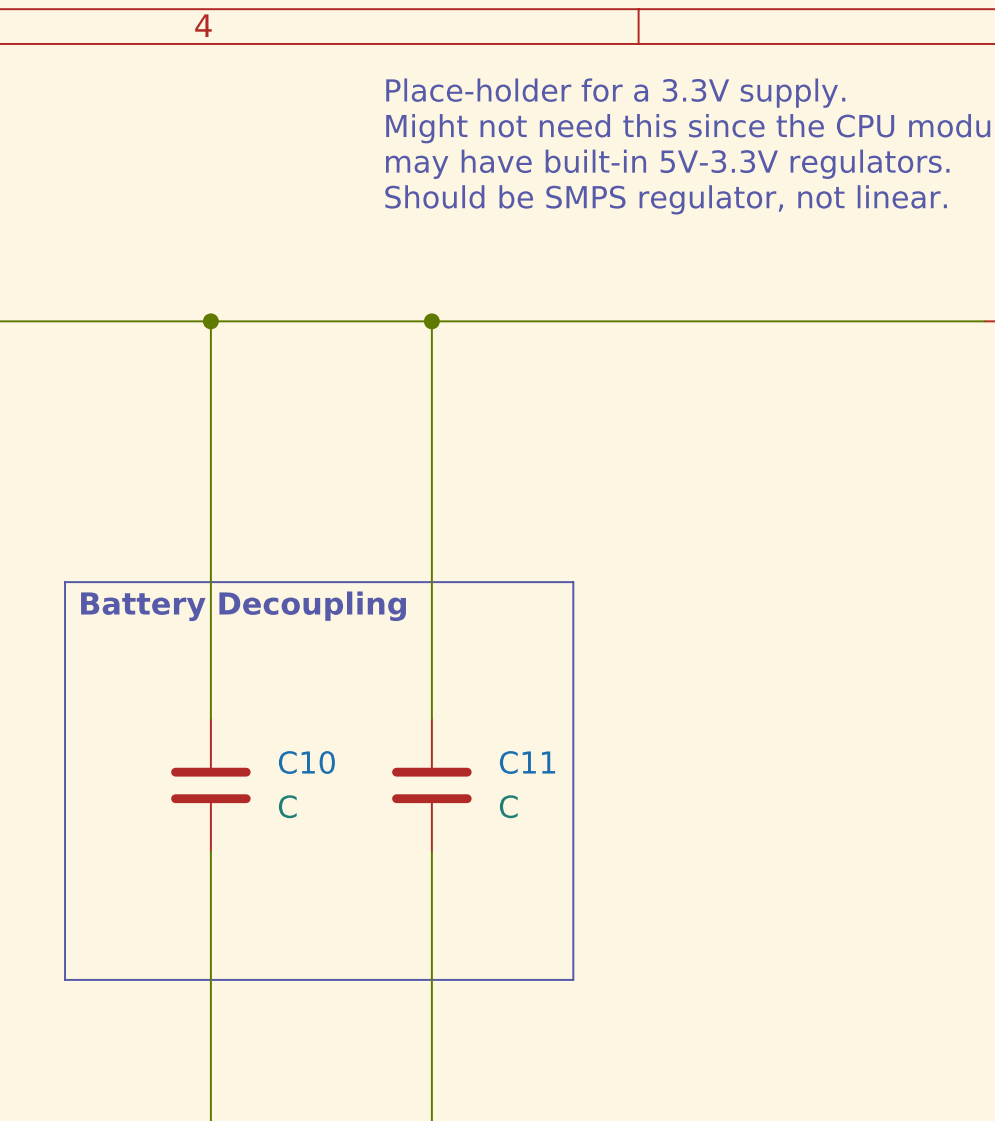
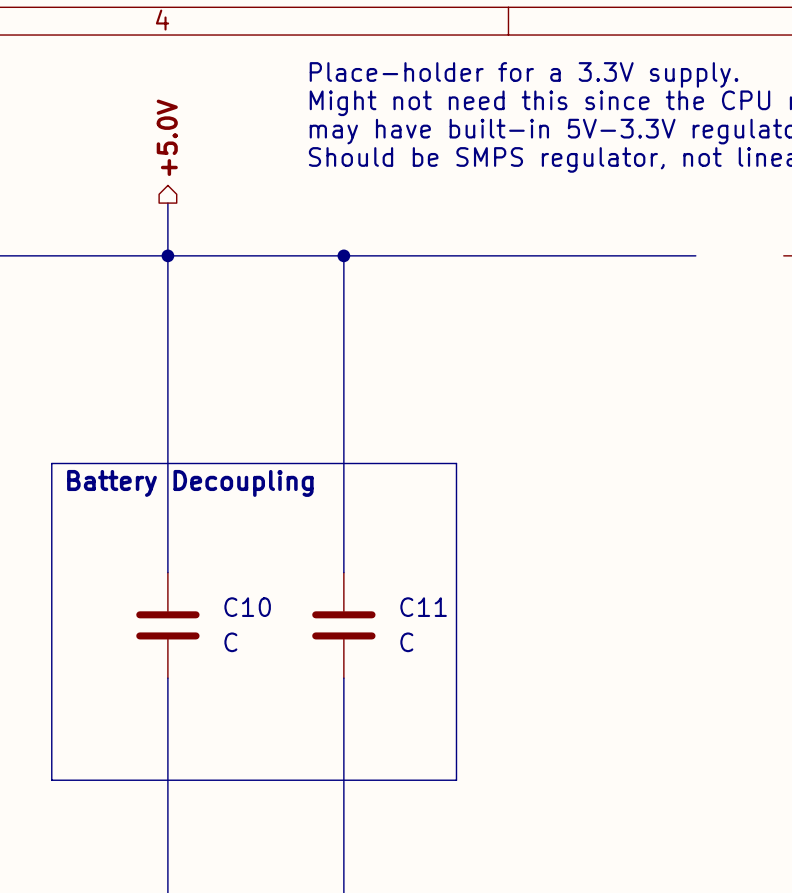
hierarchical label: none -> +5.0V (167, 137)
wire: none -> (167, 203) (167, 255)
wire: (873, 321) (984, 321) -> none

